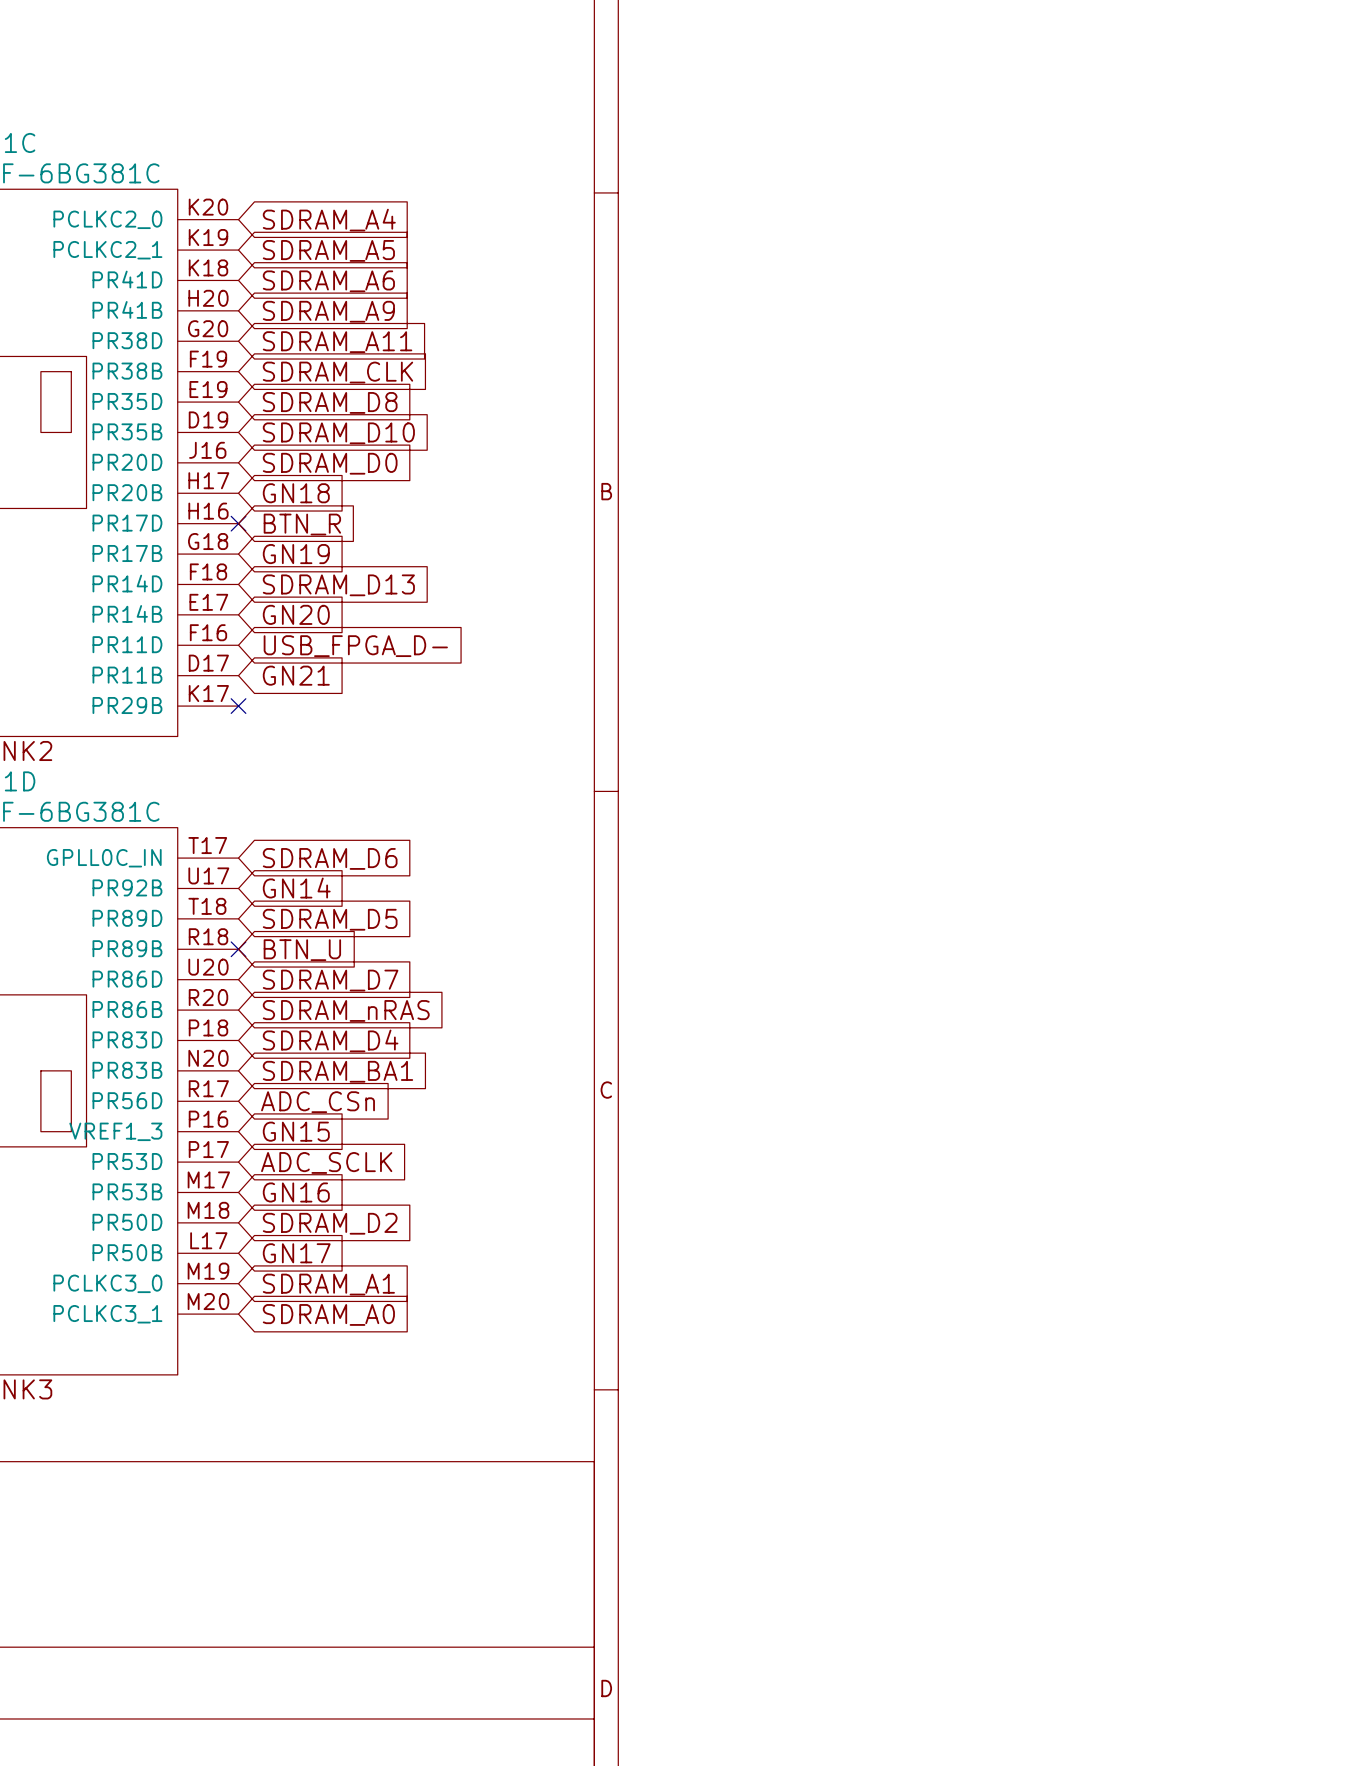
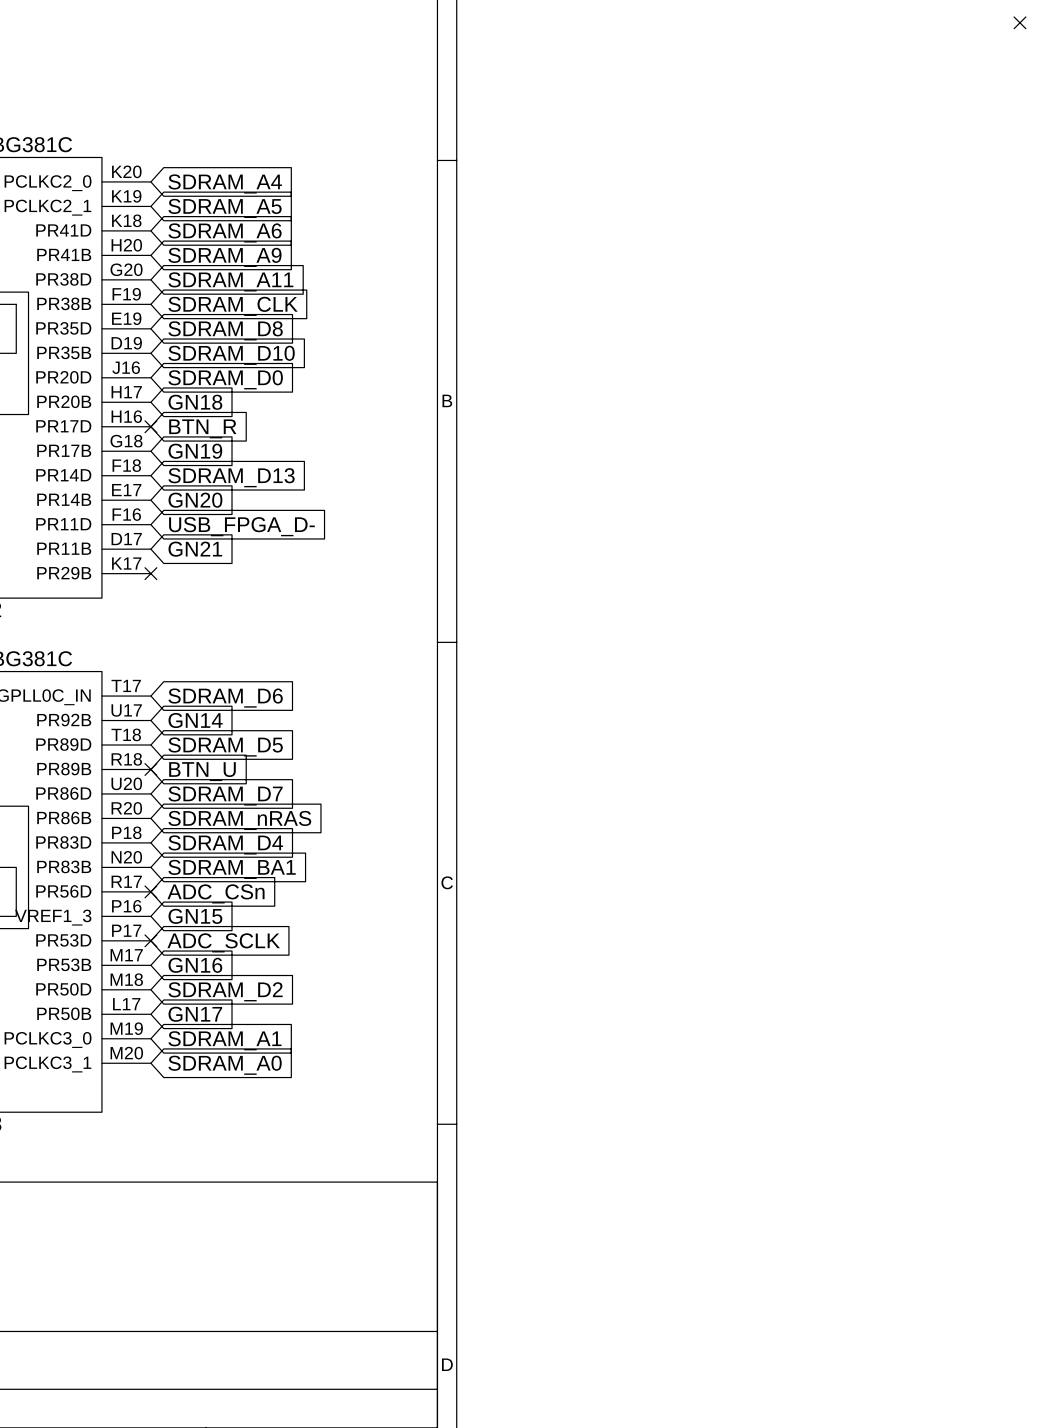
no-connect mark: none -> (1019, 22)
no-connect mark: none -> (150, 891)
no-connect mark: none -> (150, 940)

